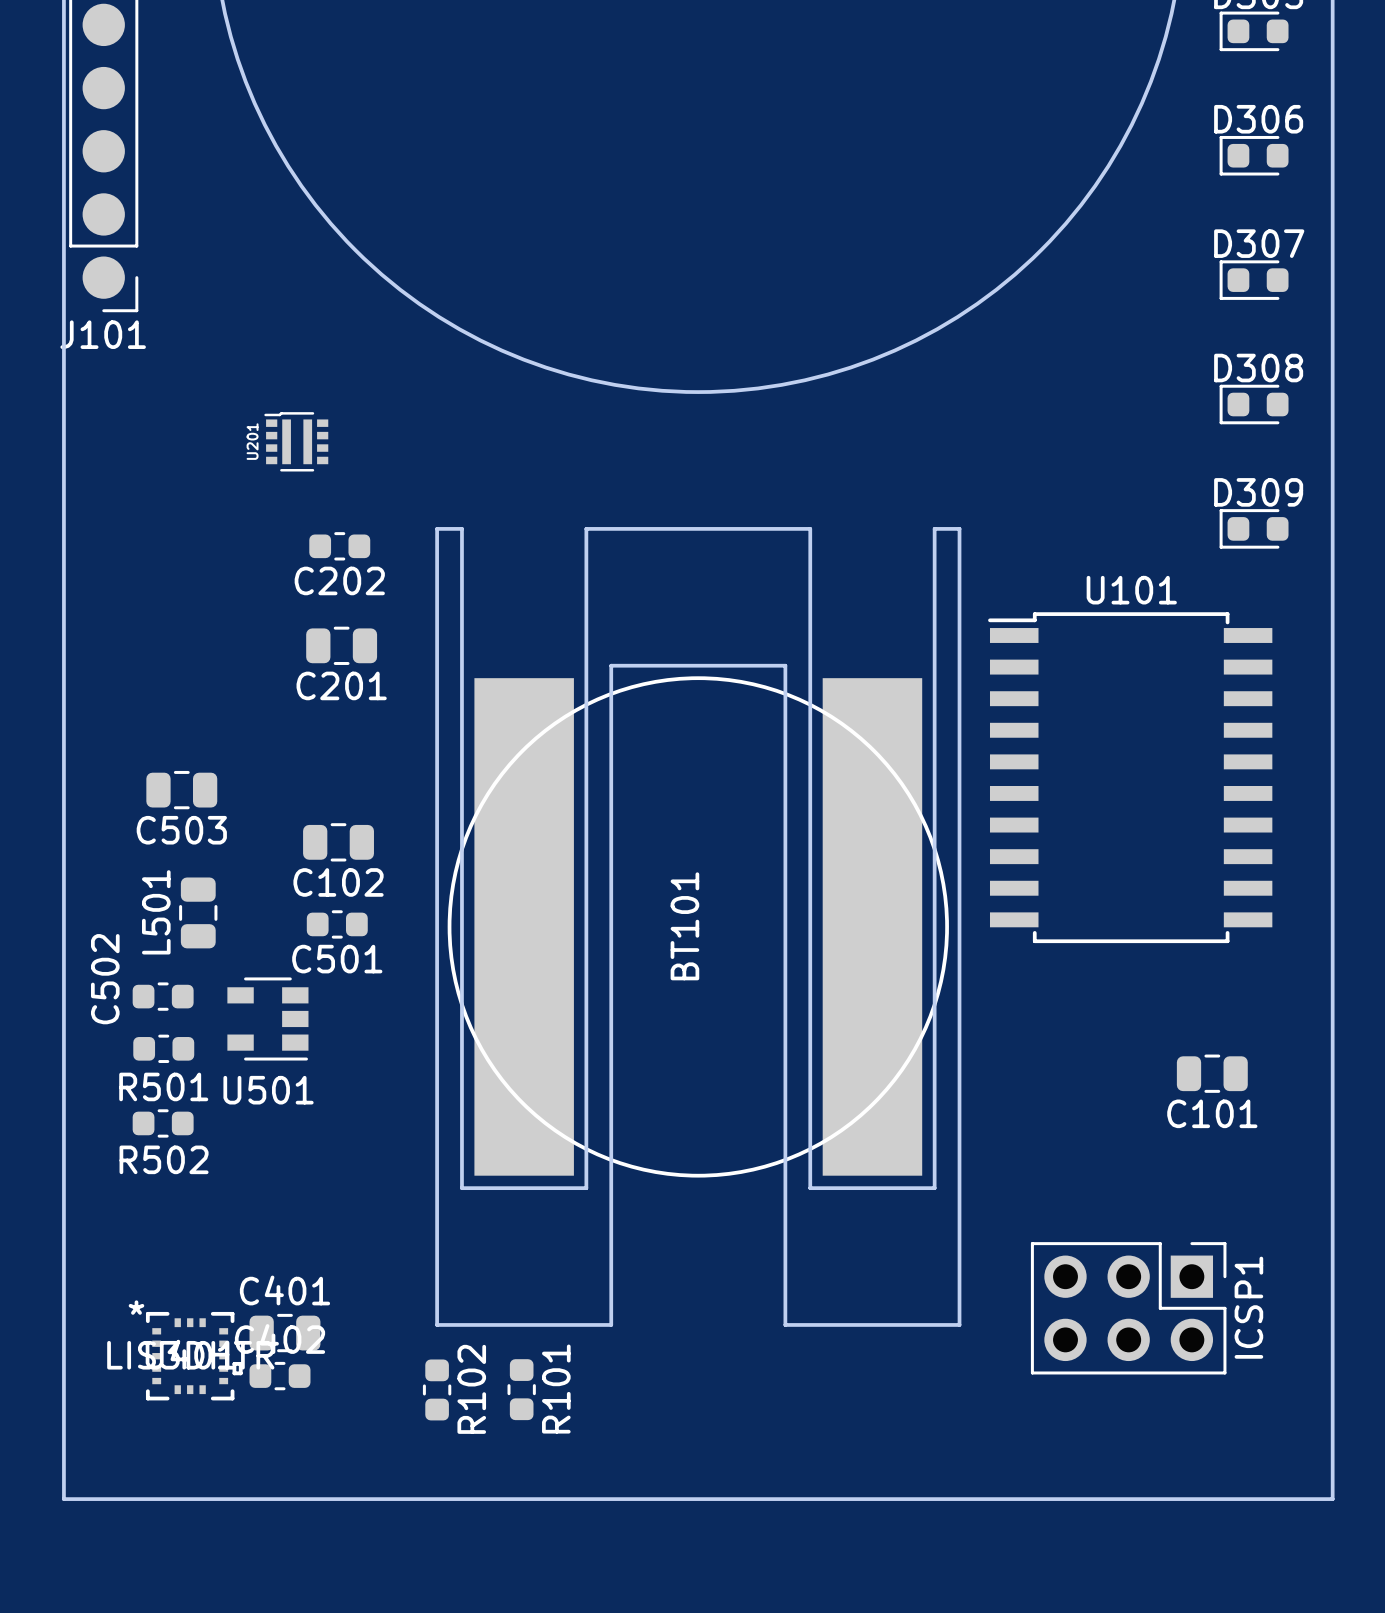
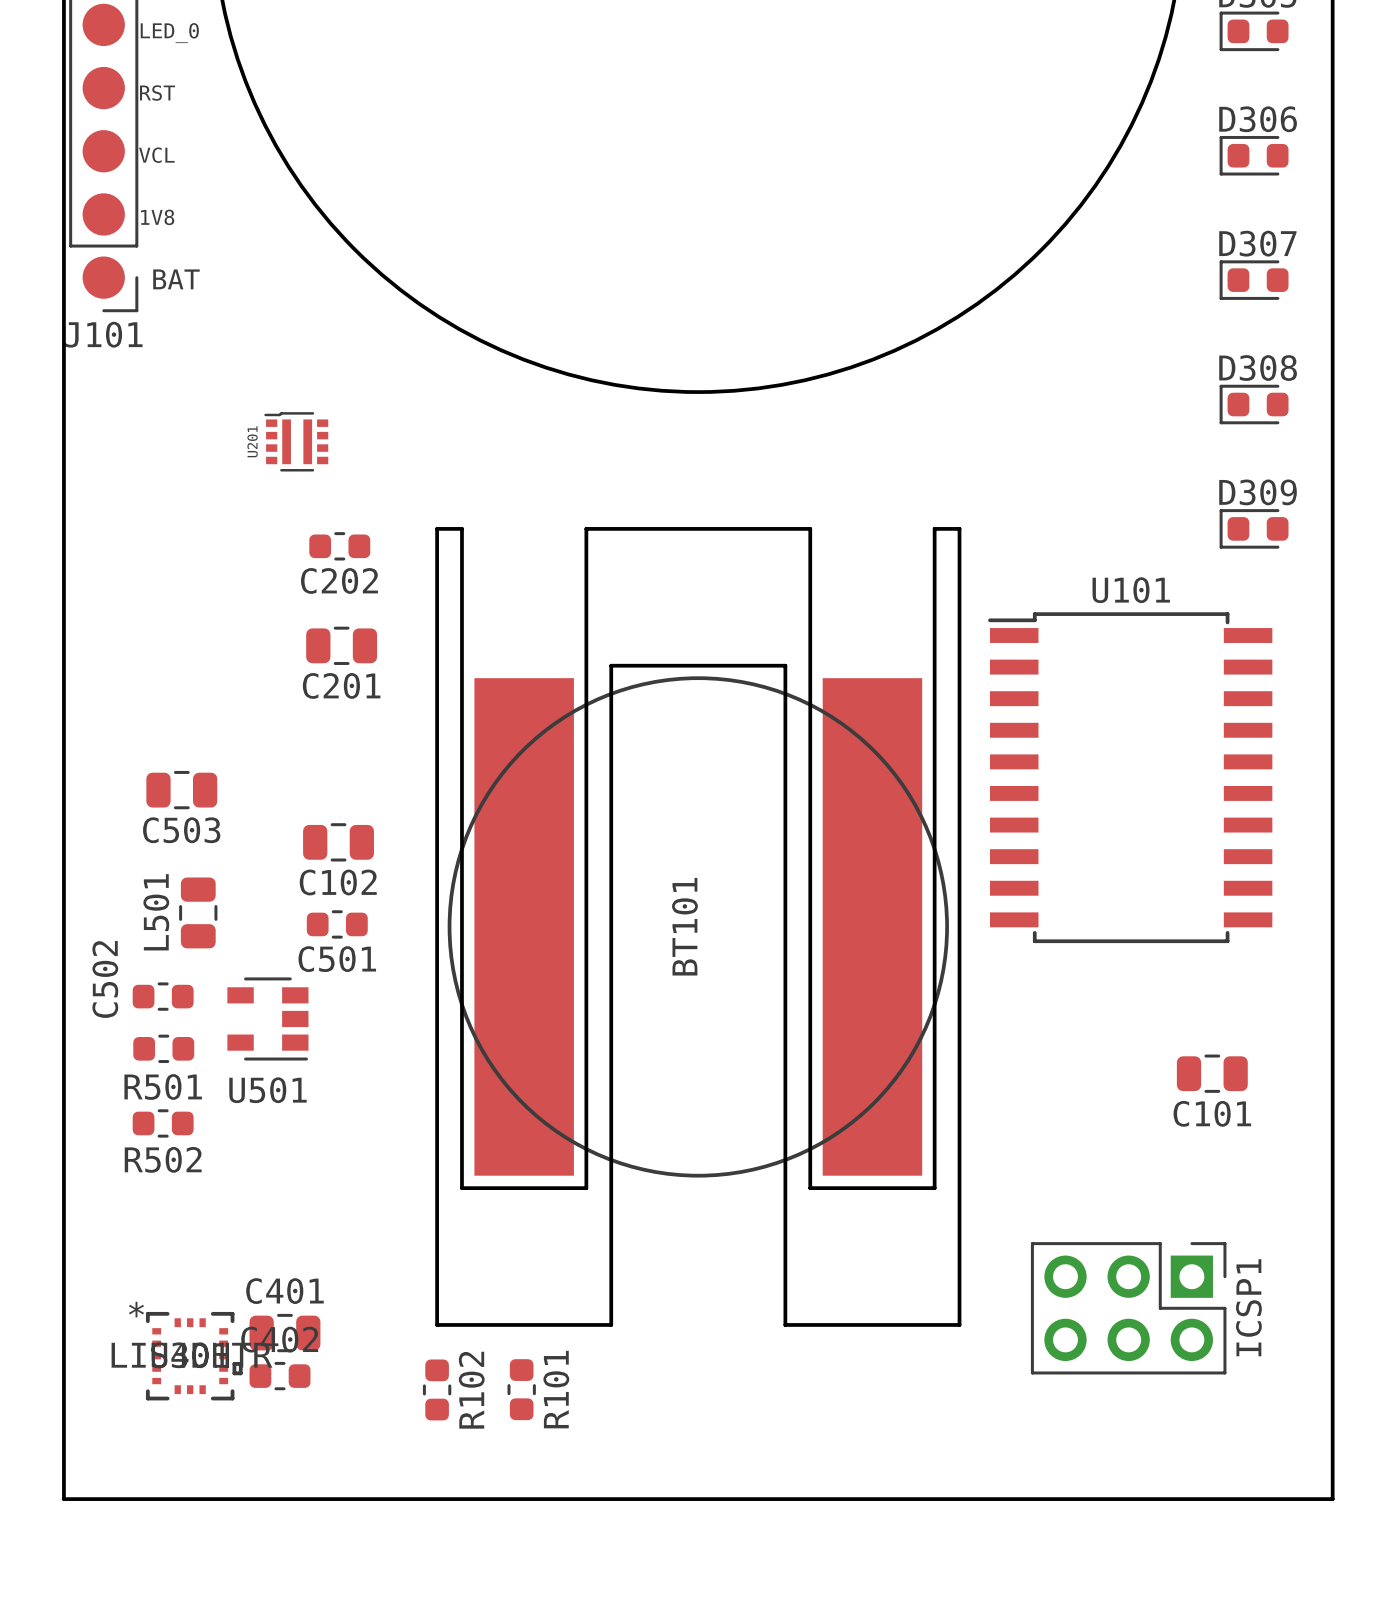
text: none -> LED_0 (169, 33)
text: none -> RST (157, 93)
text: none -> VCL (156, 155)
text: none -> 1V8 (157, 217)
text: none -> BAT (176, 279)

